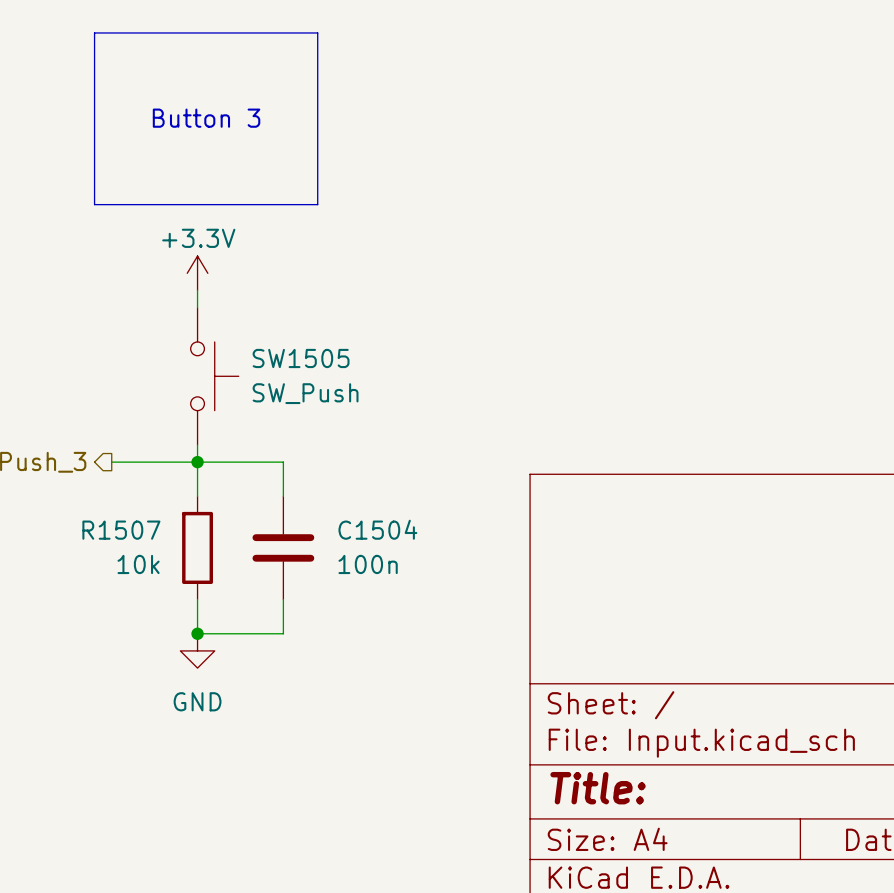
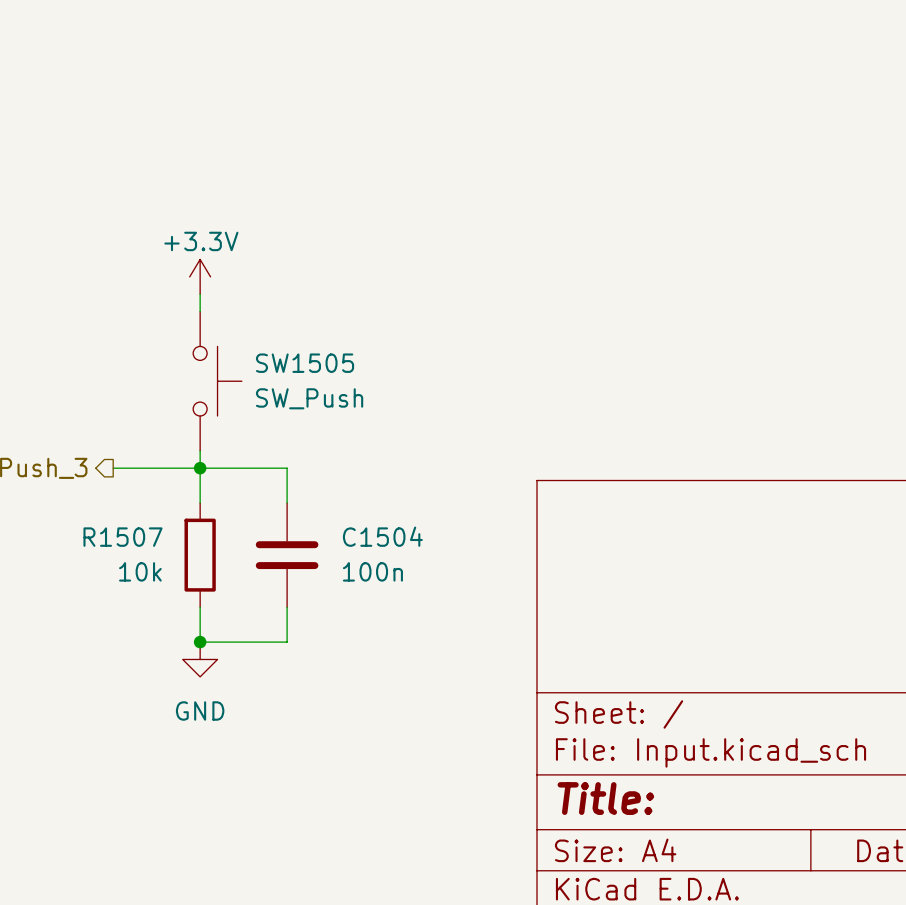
line: (94, 32) (317, 32) (317, 204) (94, 204) (94, 32) -> none
text: Button 3 (206, 118) -> none

